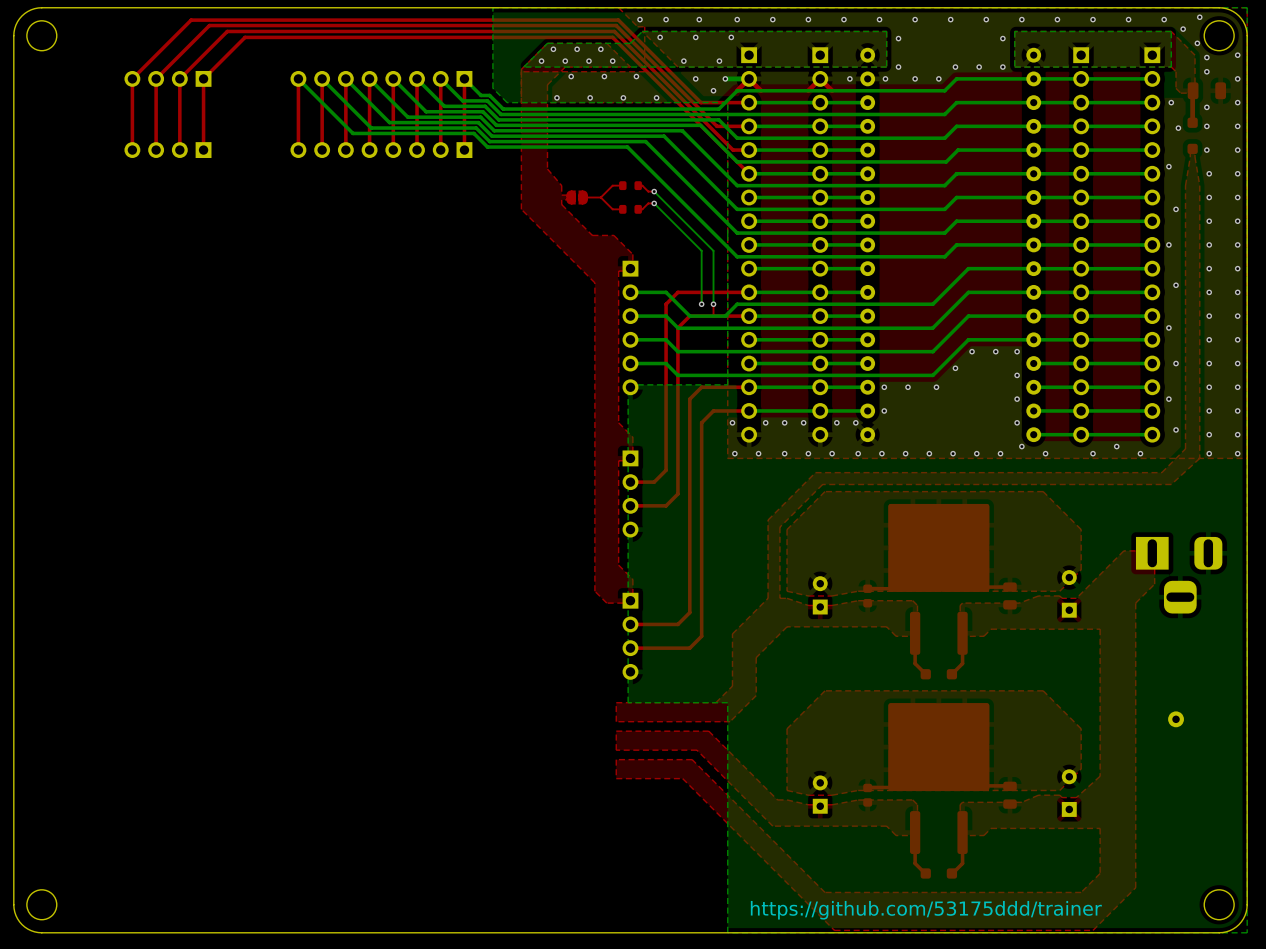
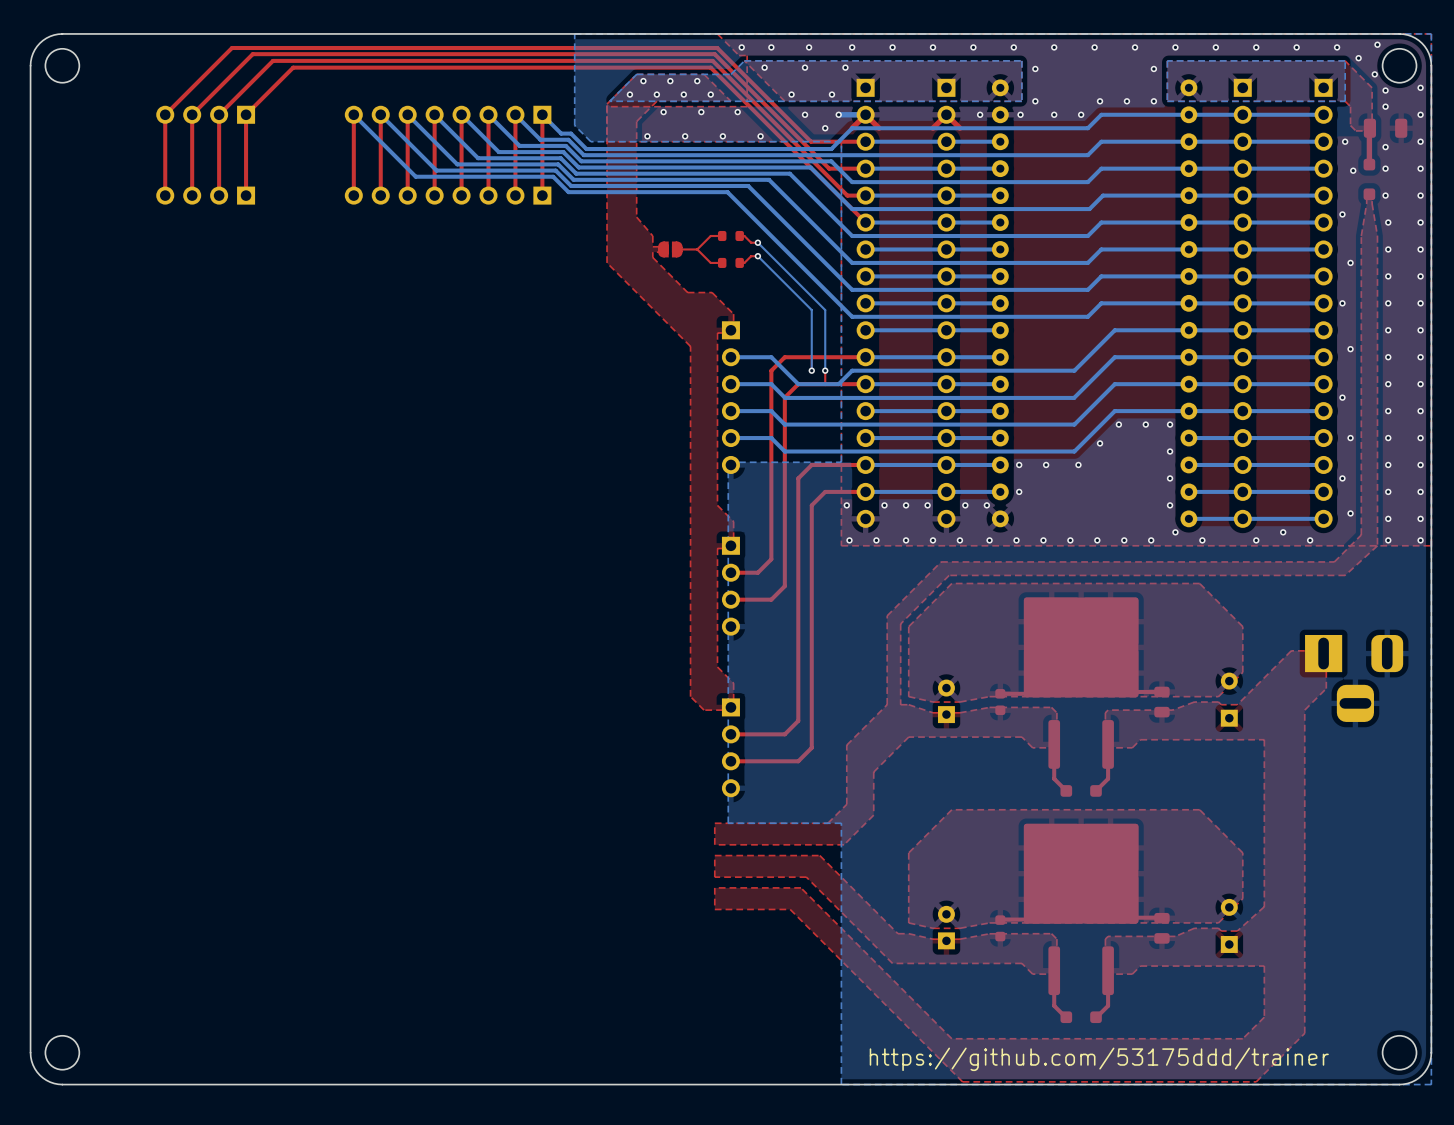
part: (1176, 719) -> none

